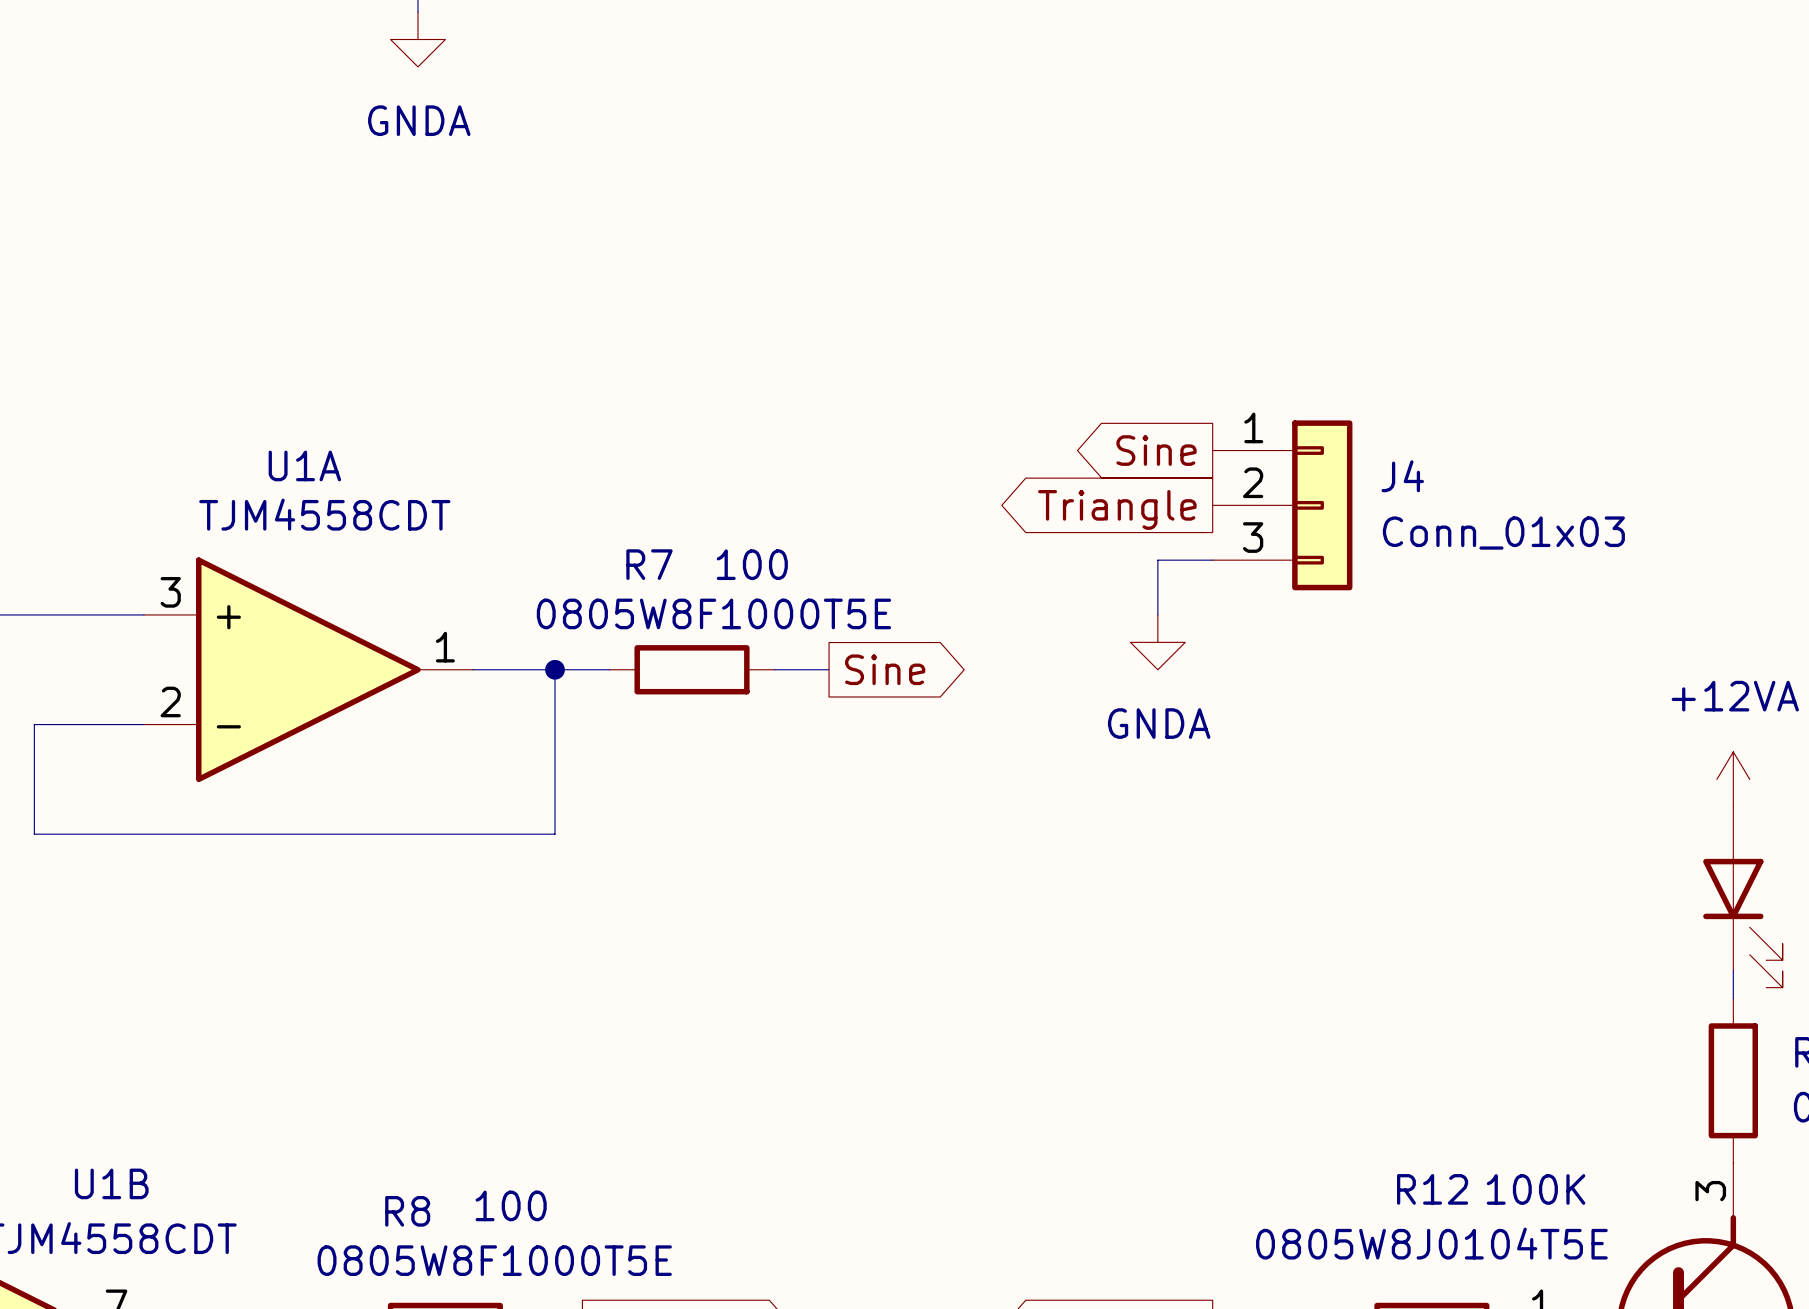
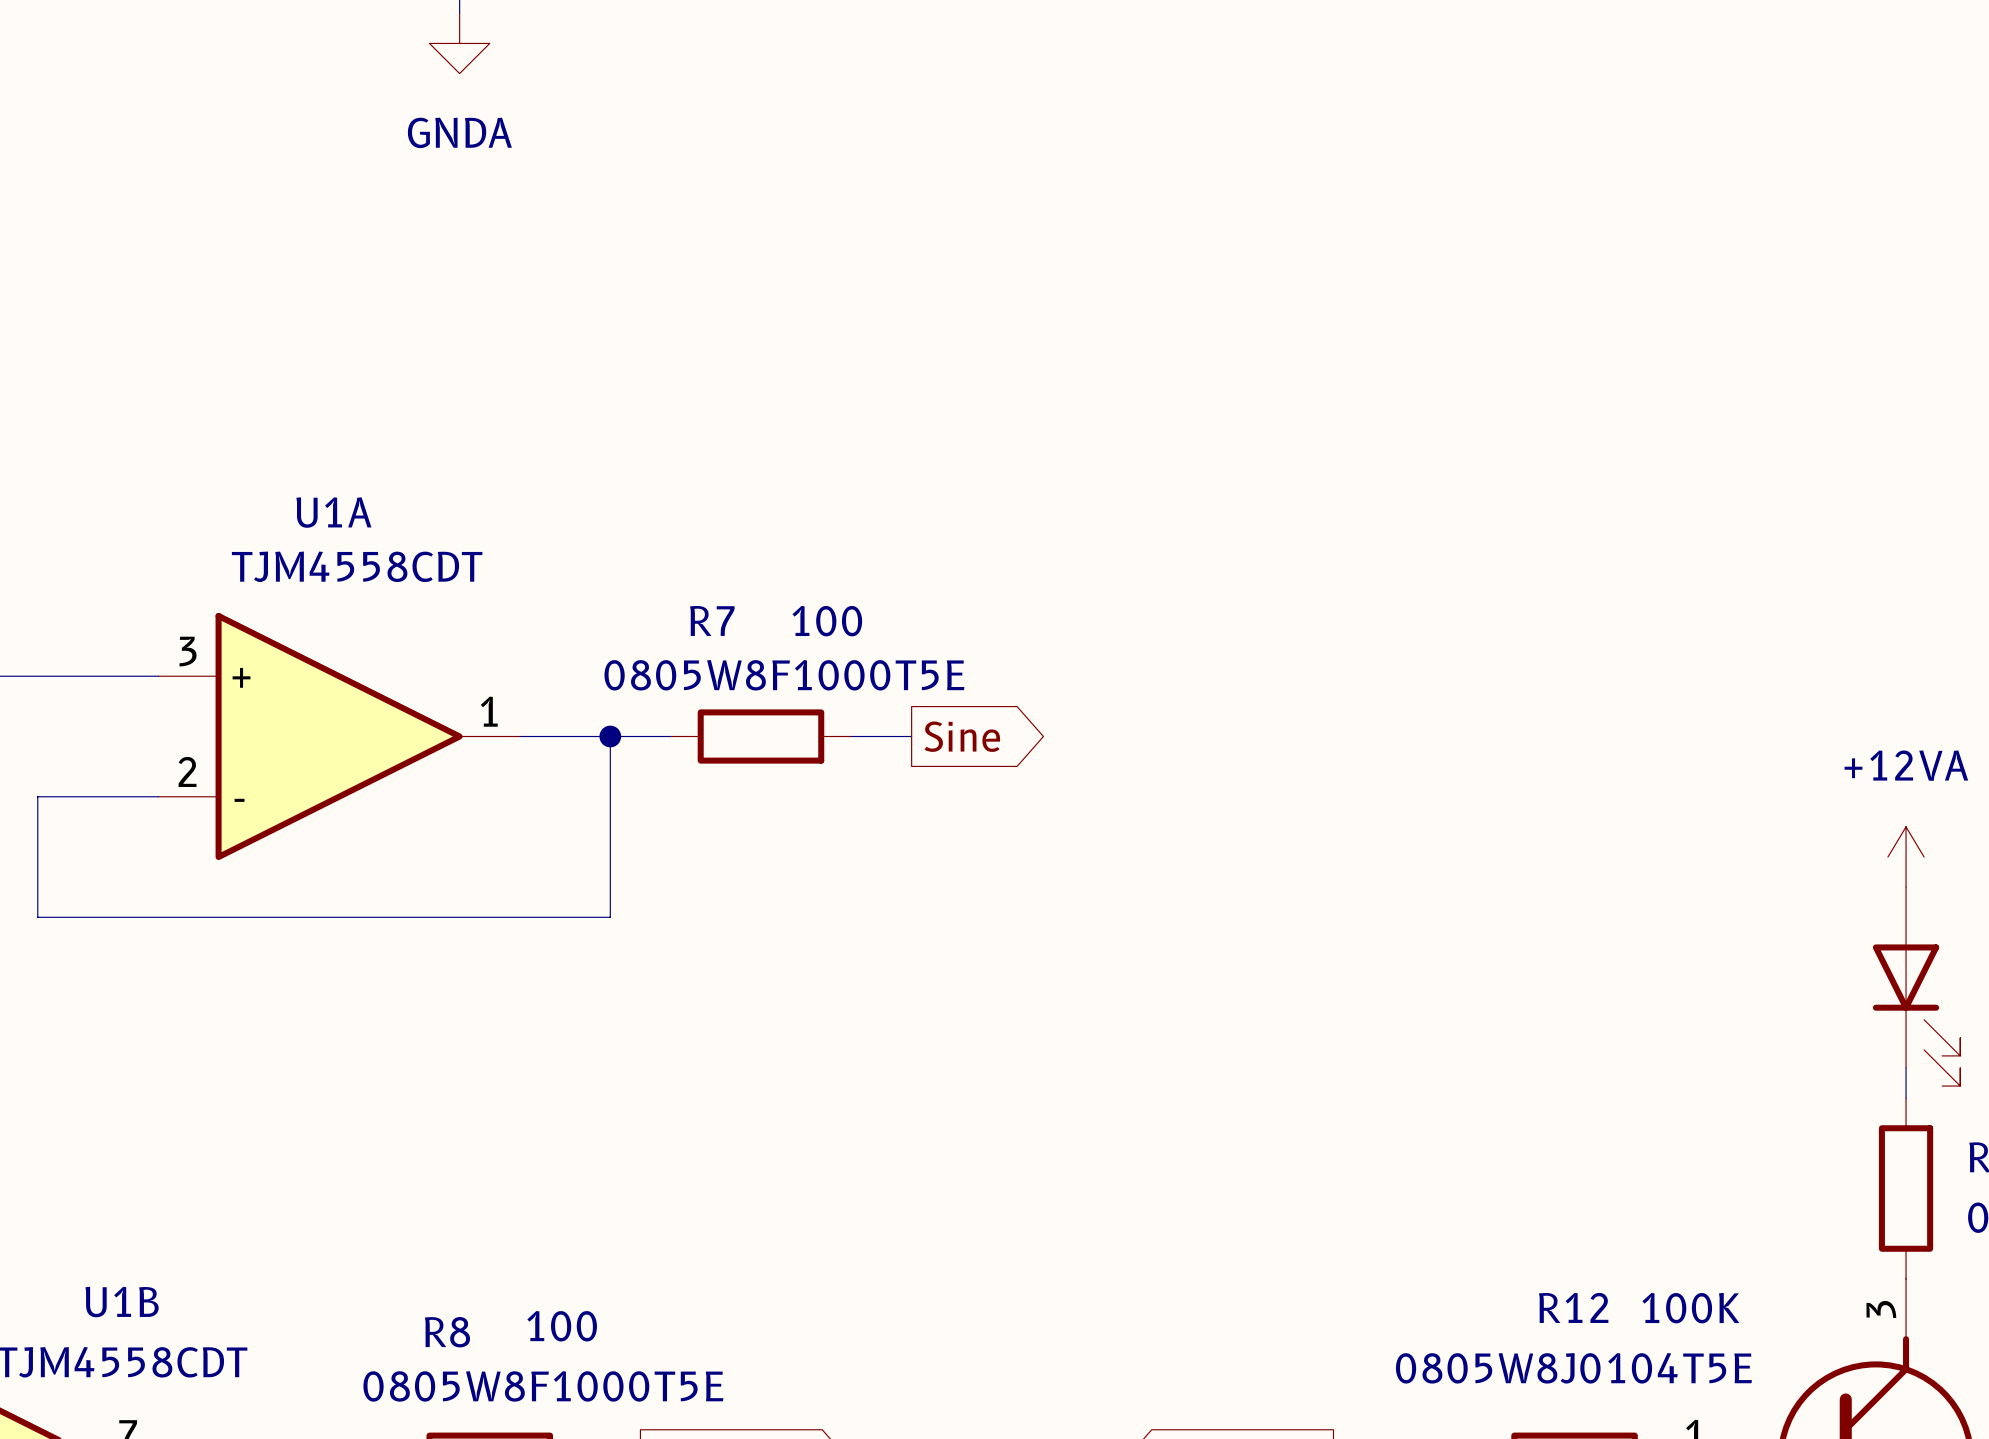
global label: Sine (1156, 450) -> none
J4: Conn_01x03 (1282, 505) -> none
global label: Triangle (1117, 509) -> none
wire: (1212, 560) (1157, 560) (1157, 614) -> none
power symbol: GNDA (1157, 642) -> none

